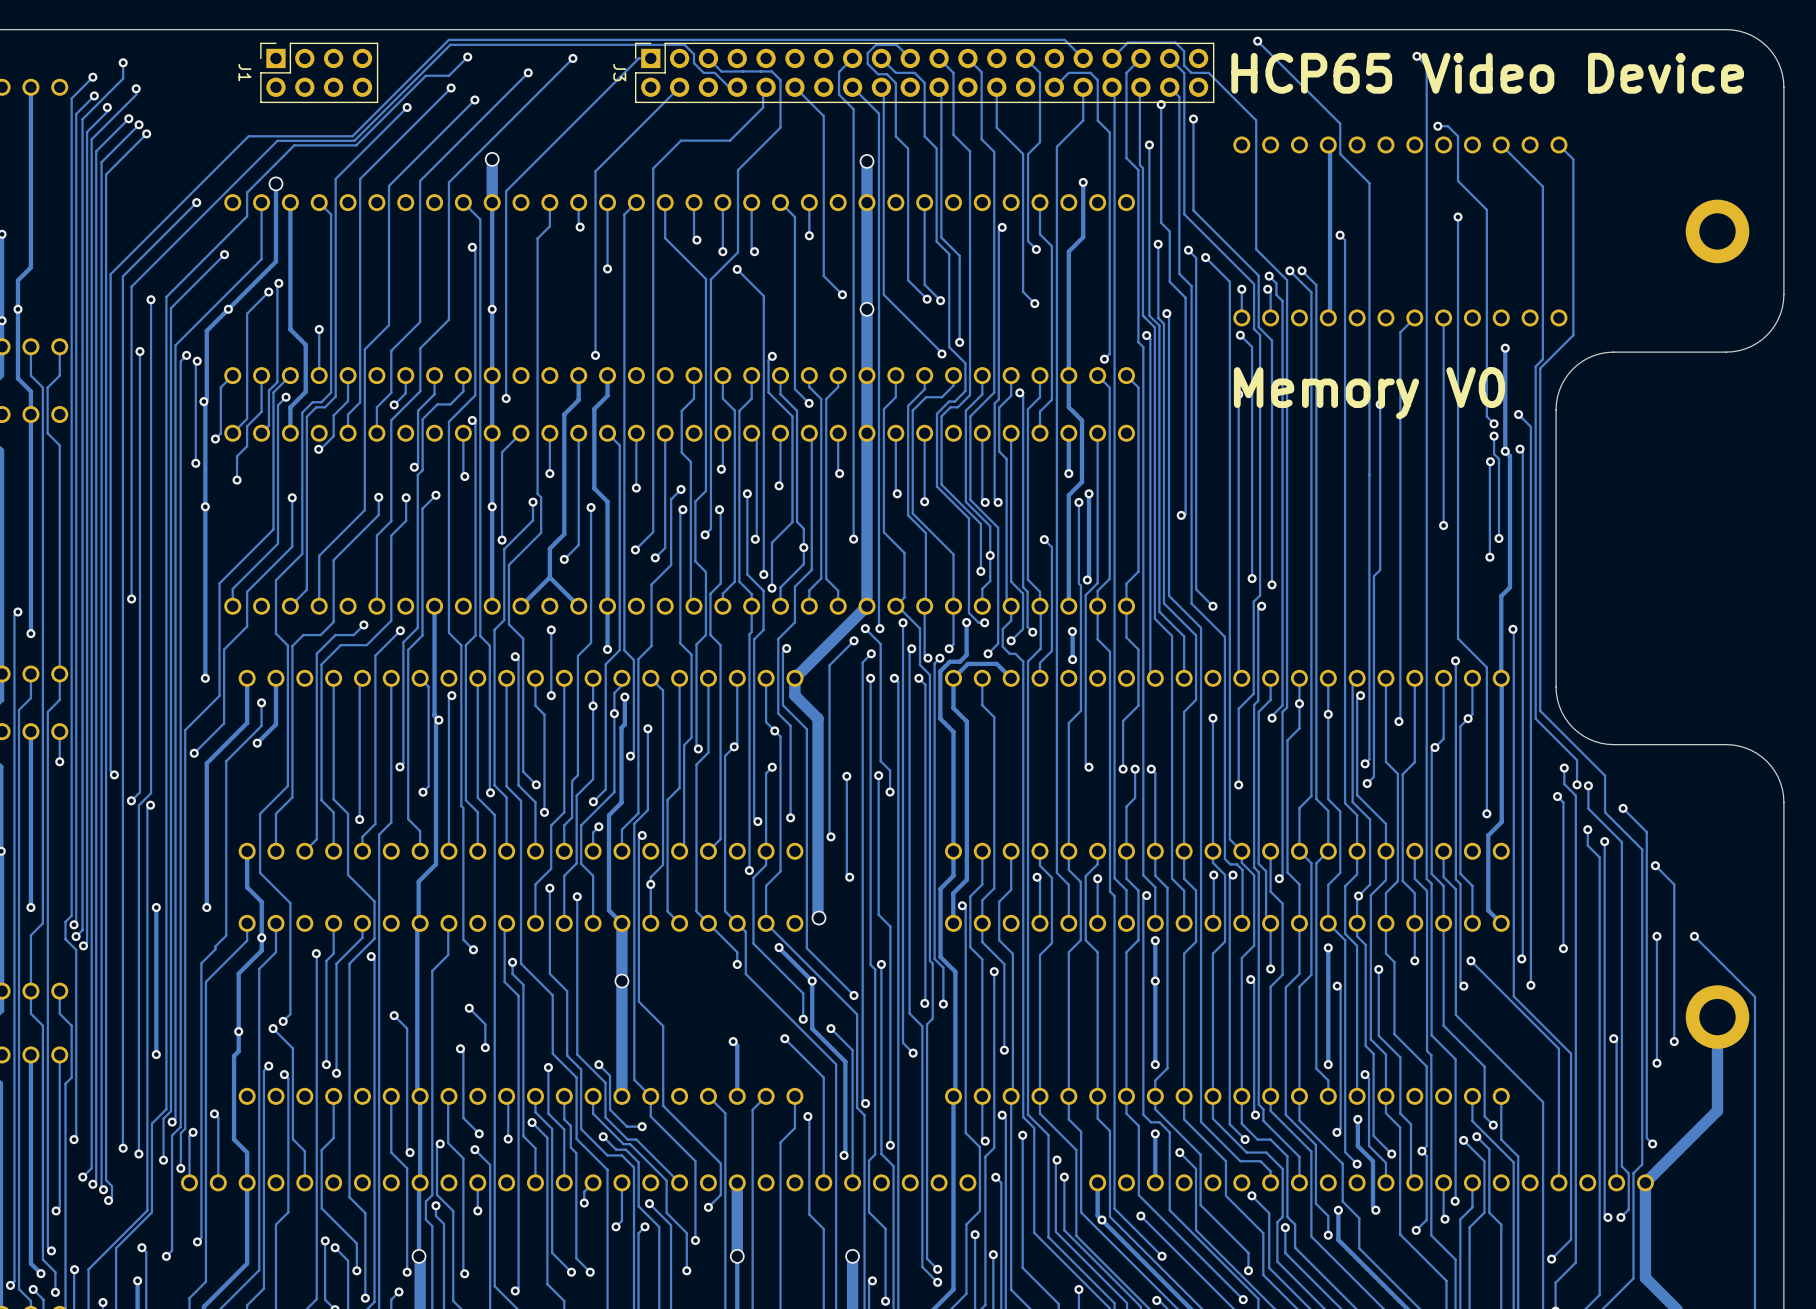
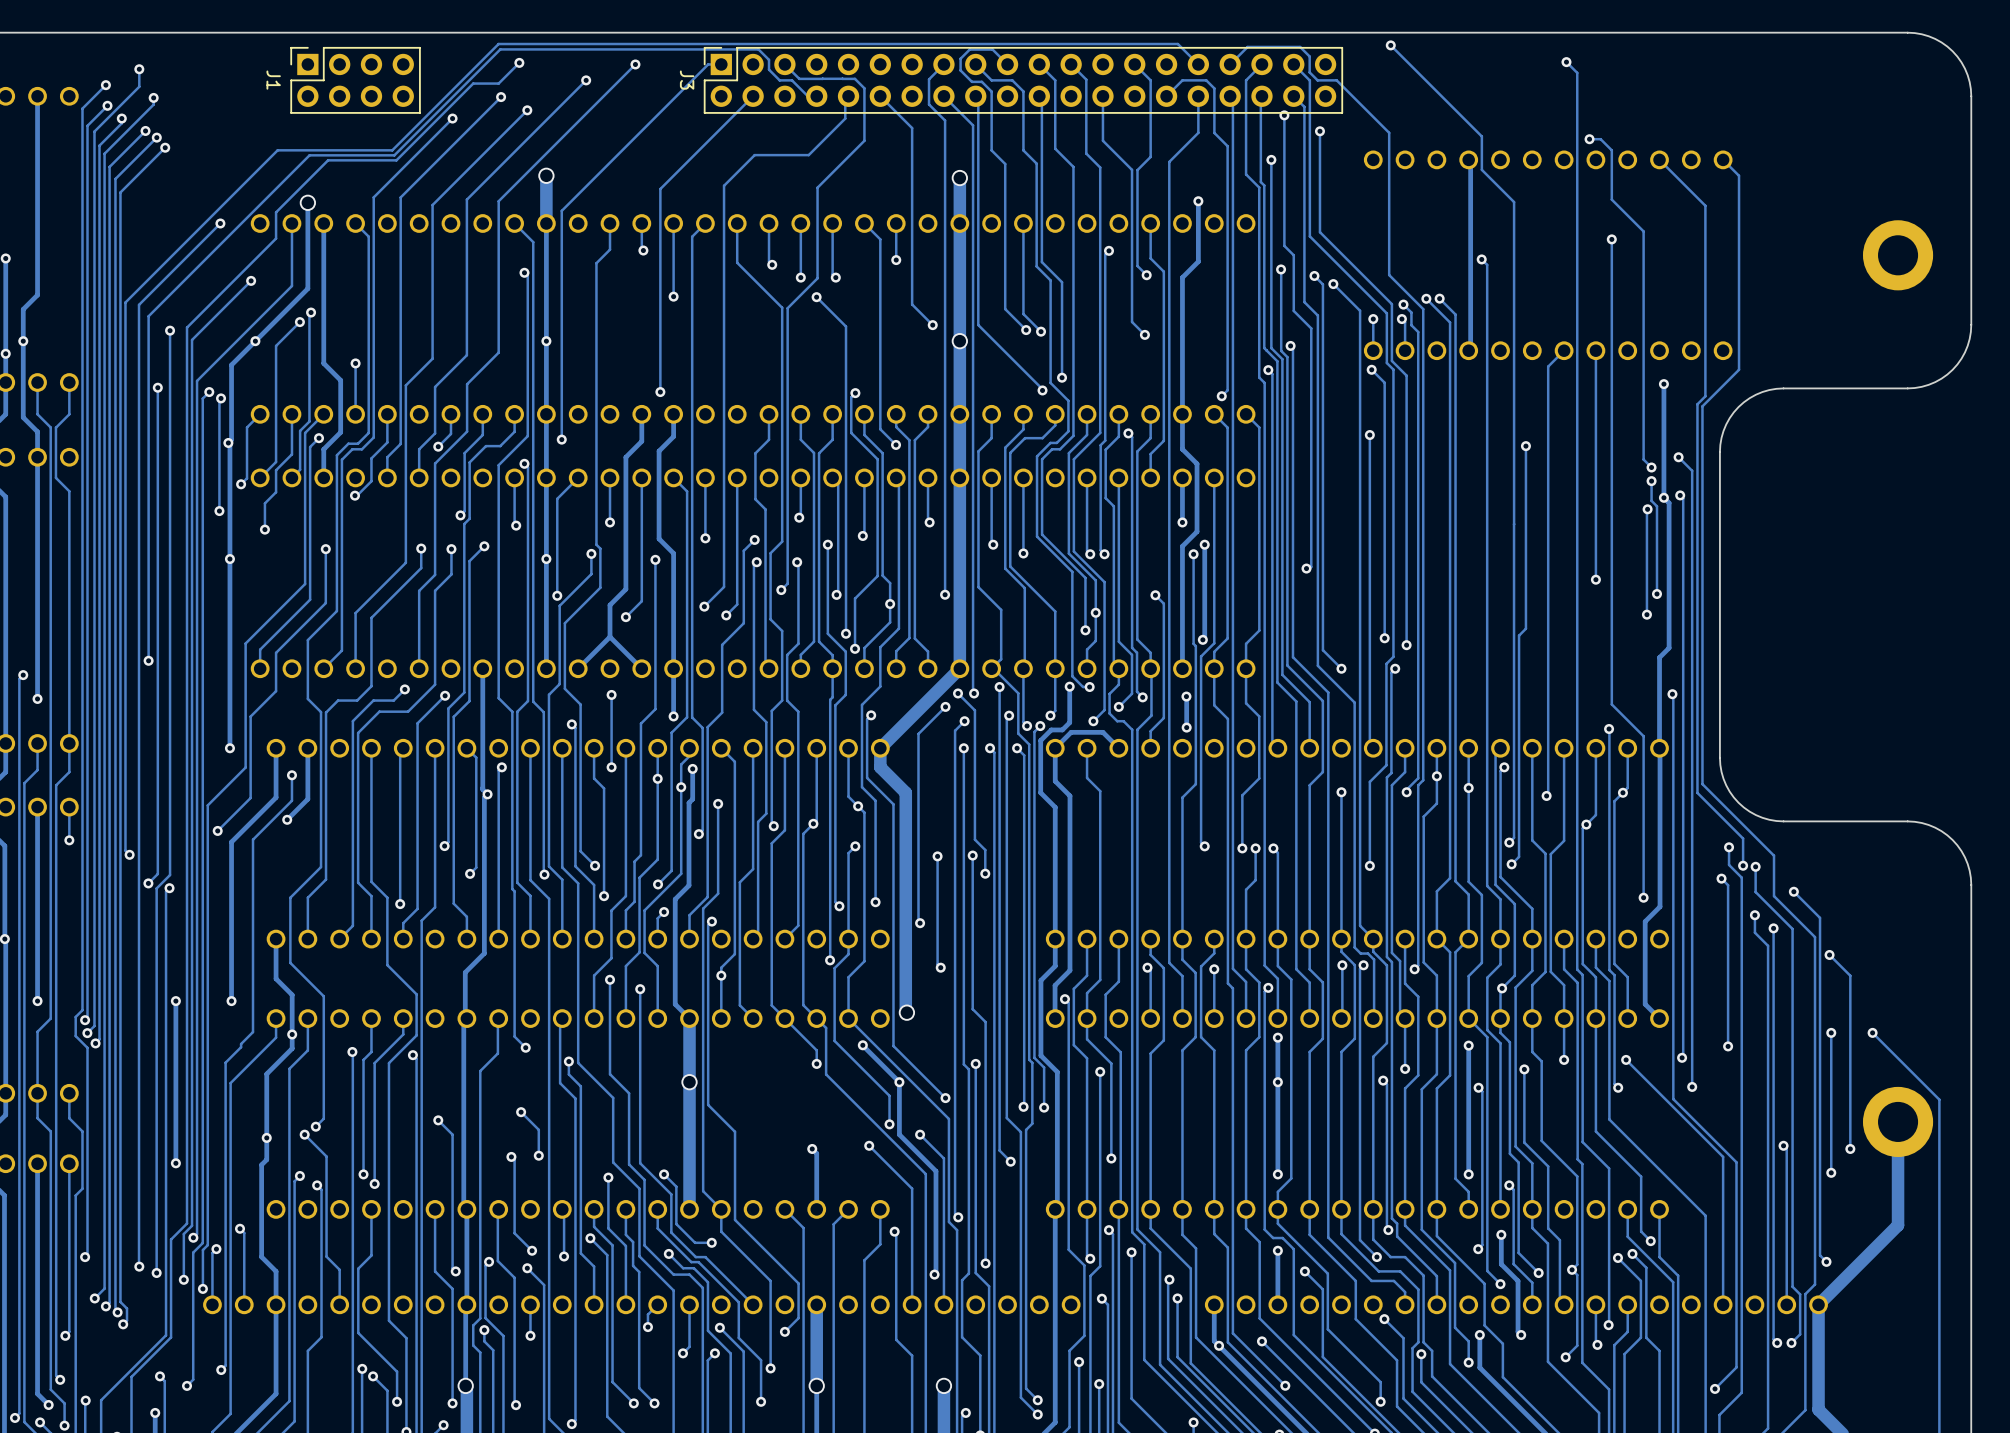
text: HCP65 Video Device (1487, 73) -> none
text: Memory V0 (1369, 393) -> none

